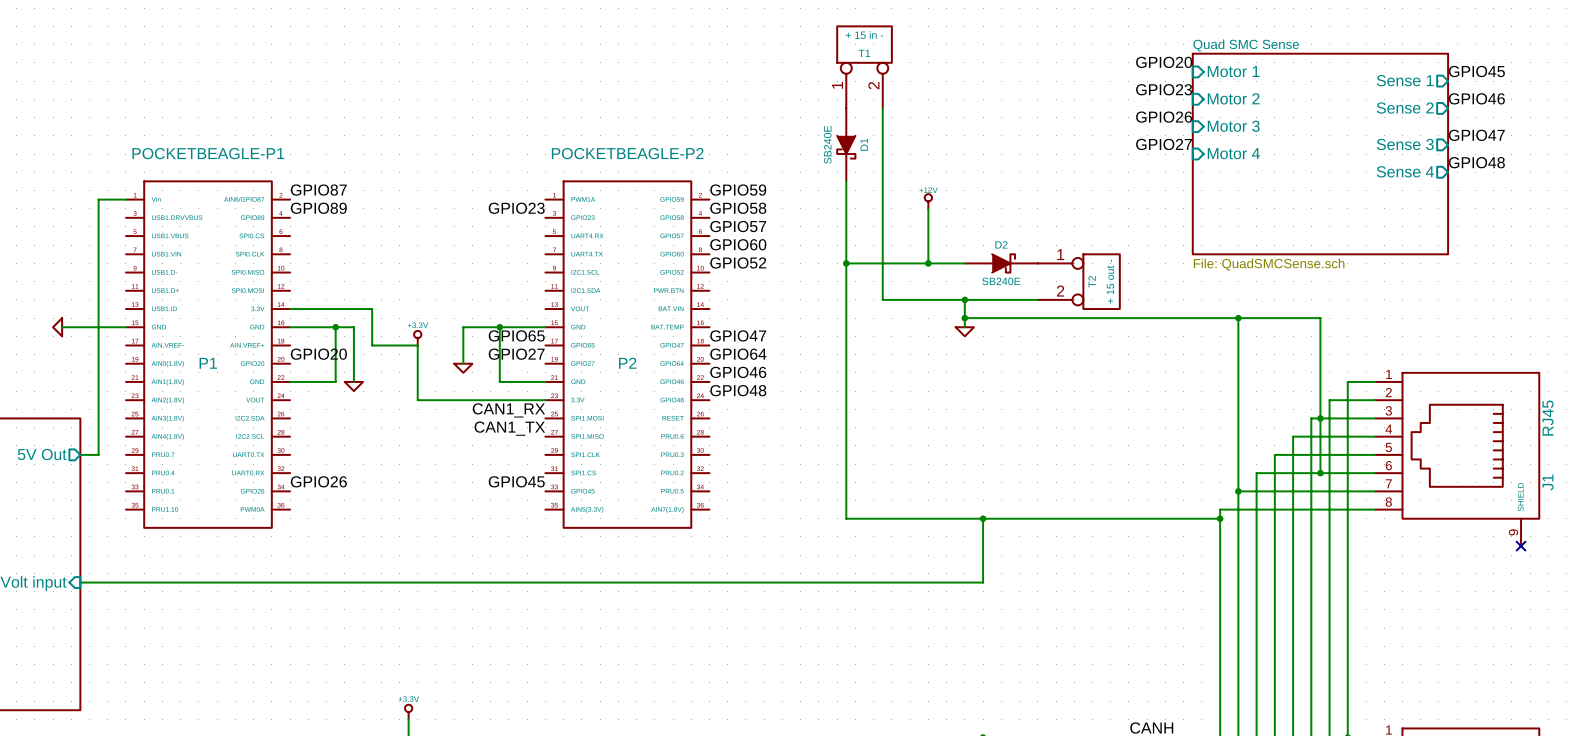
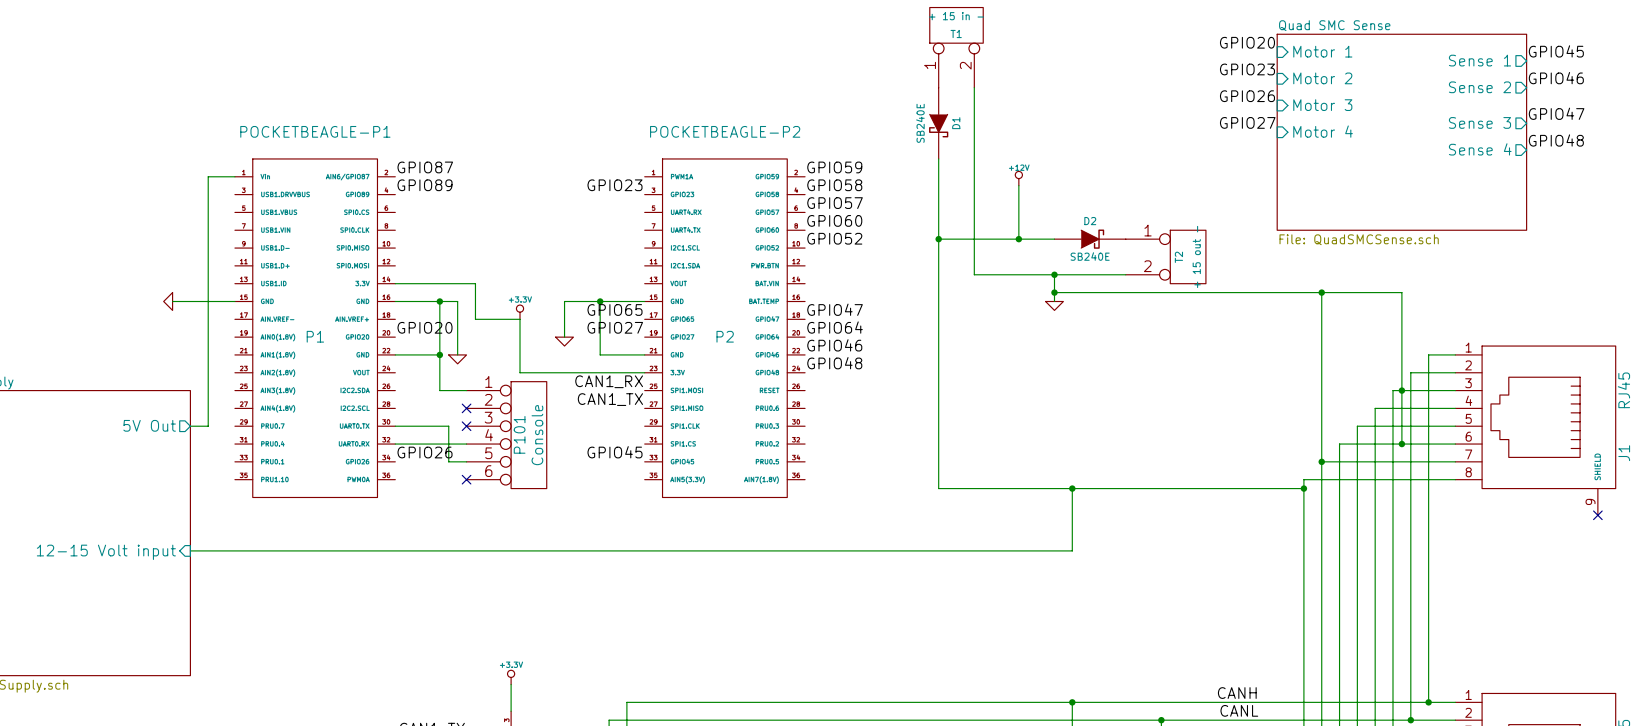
wire: none -> (439, 354) (439, 390) (466, 390)
junction: none -> (439, 354)
no-connect mark: none -> (466, 408)
wire: none -> (395, 426) (448, 426) (448, 461) (466, 461)
no-connect mark: none -> (466, 426)
P101: none -> Console (506, 435)
wire: none -> (395, 444) (466, 444)
no-connect mark: none -> (466, 479)

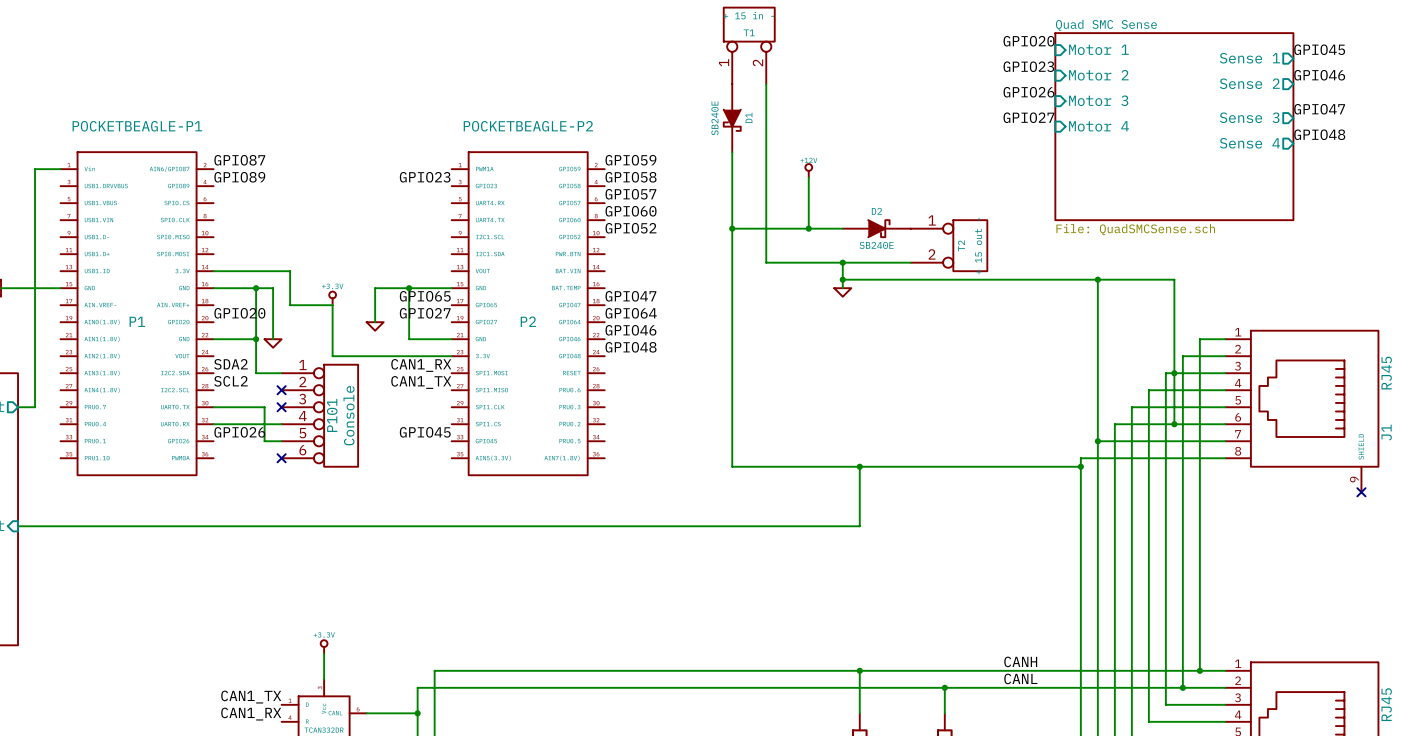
label: none -> SDA2 (230, 364)
label: none -> SCL2 (230, 381)

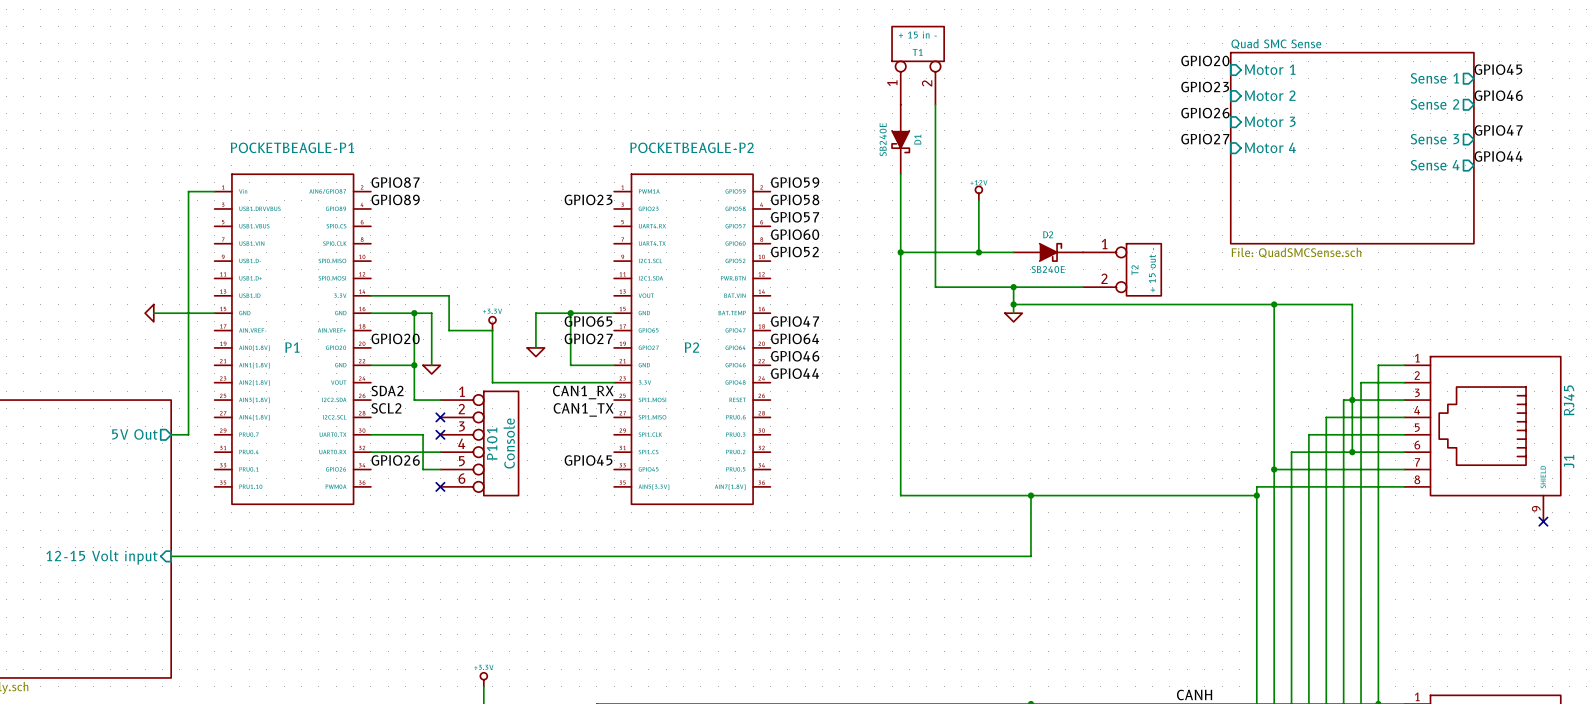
label: GPIO48 (1319, 134) -> GPIO44 (1498, 156)
label: GPIO48 (631, 347) -> GPIO44 (795, 373)

